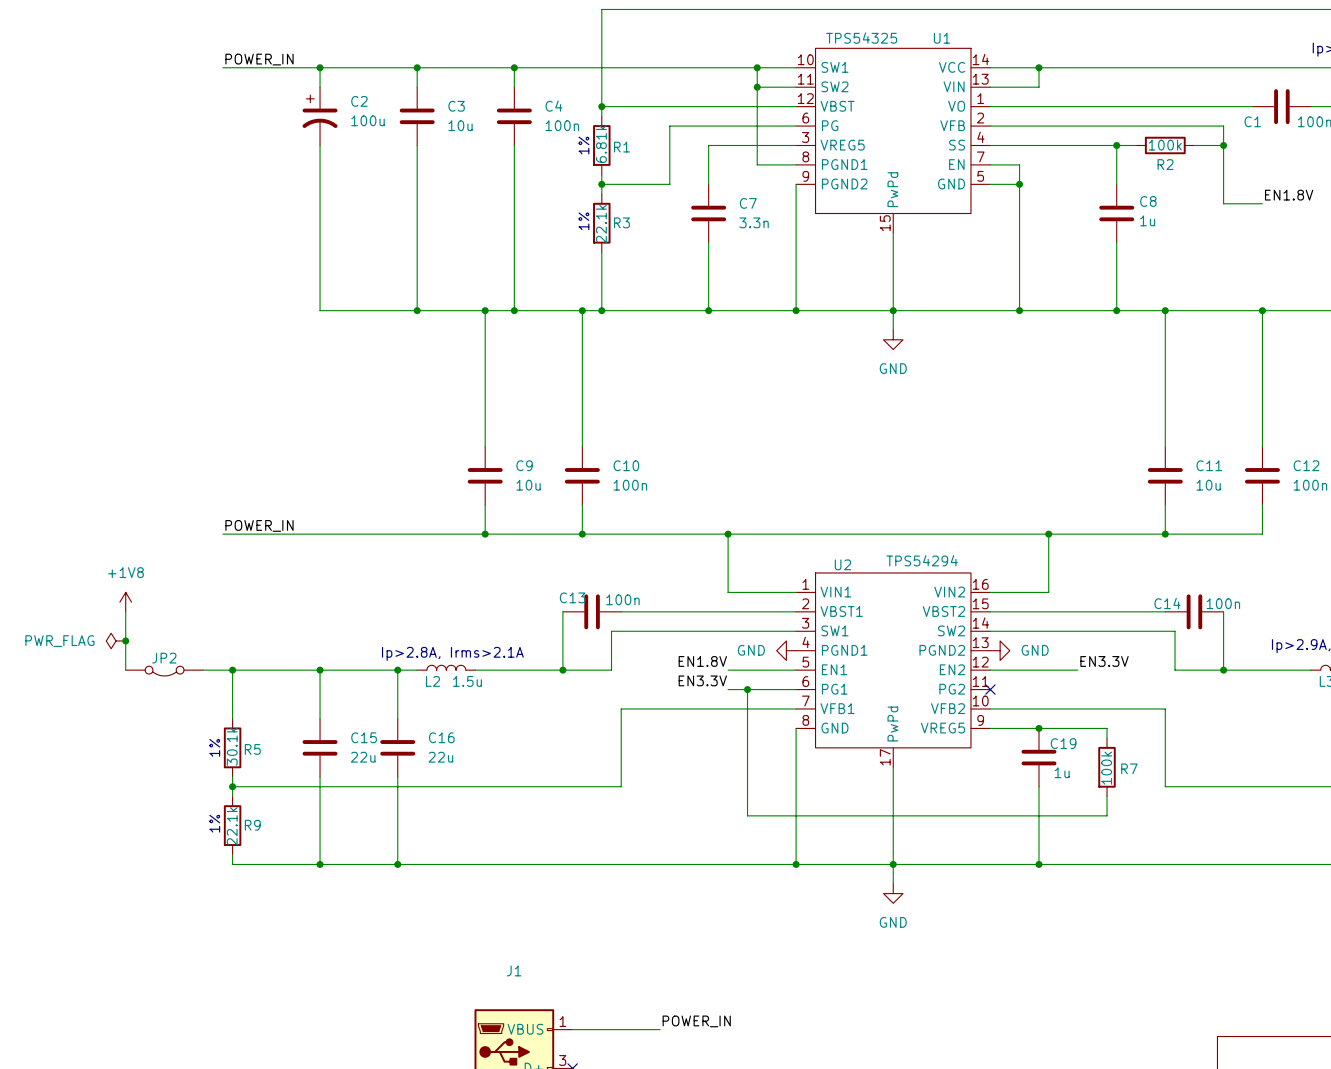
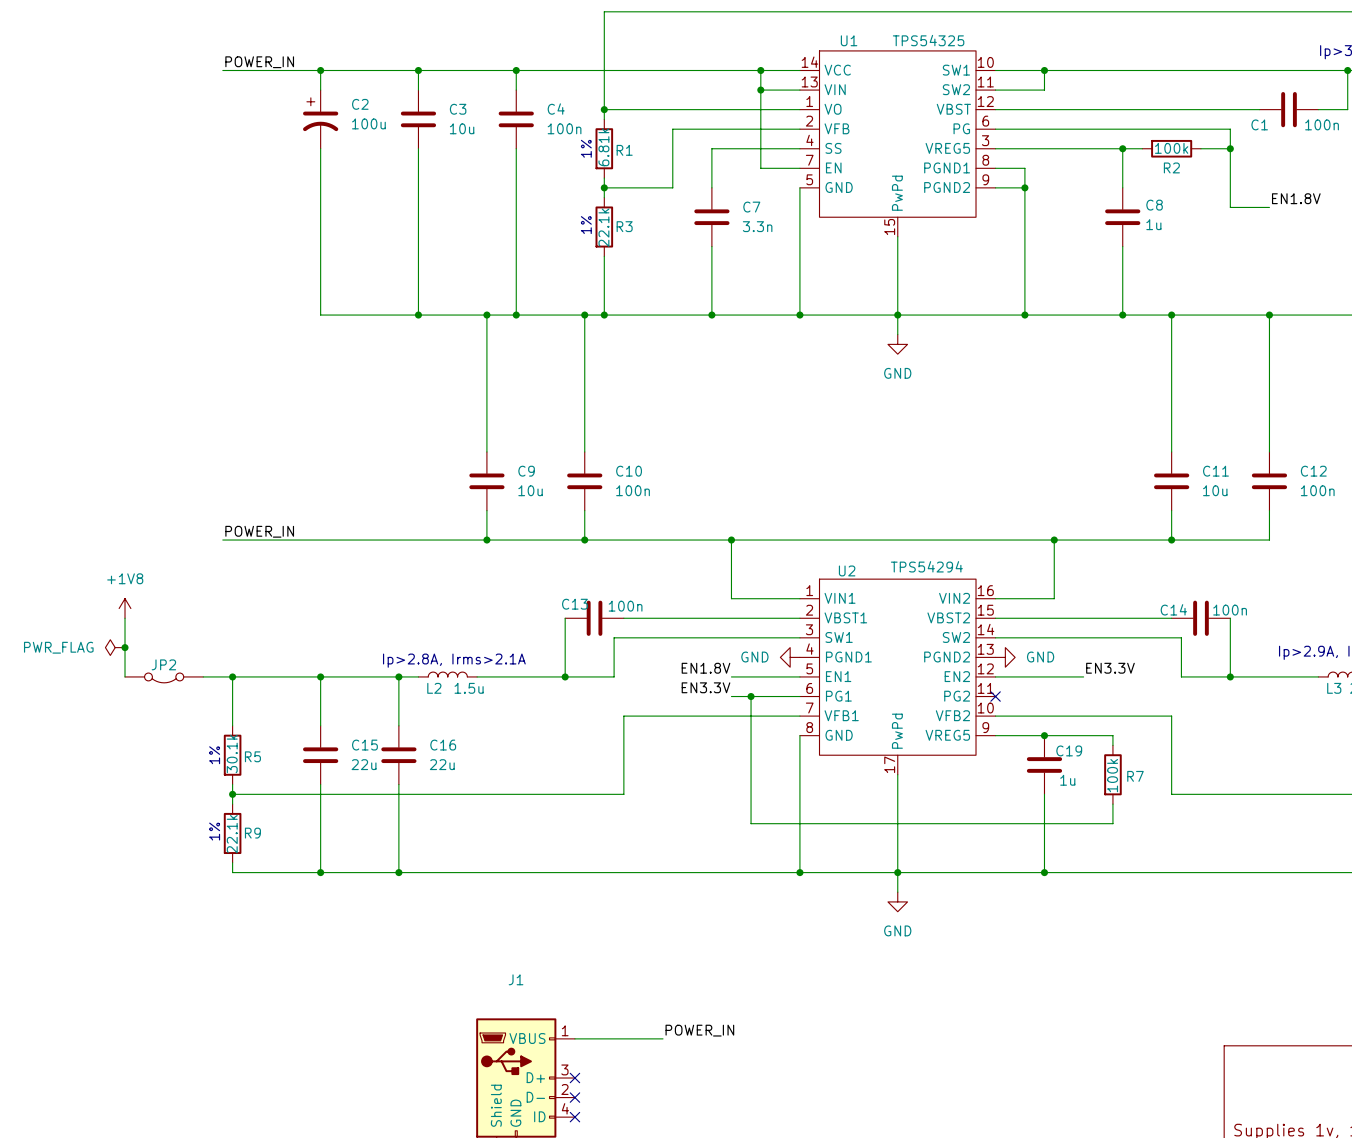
U1 flip: as is (893, 130) -> left-right (897, 134)

